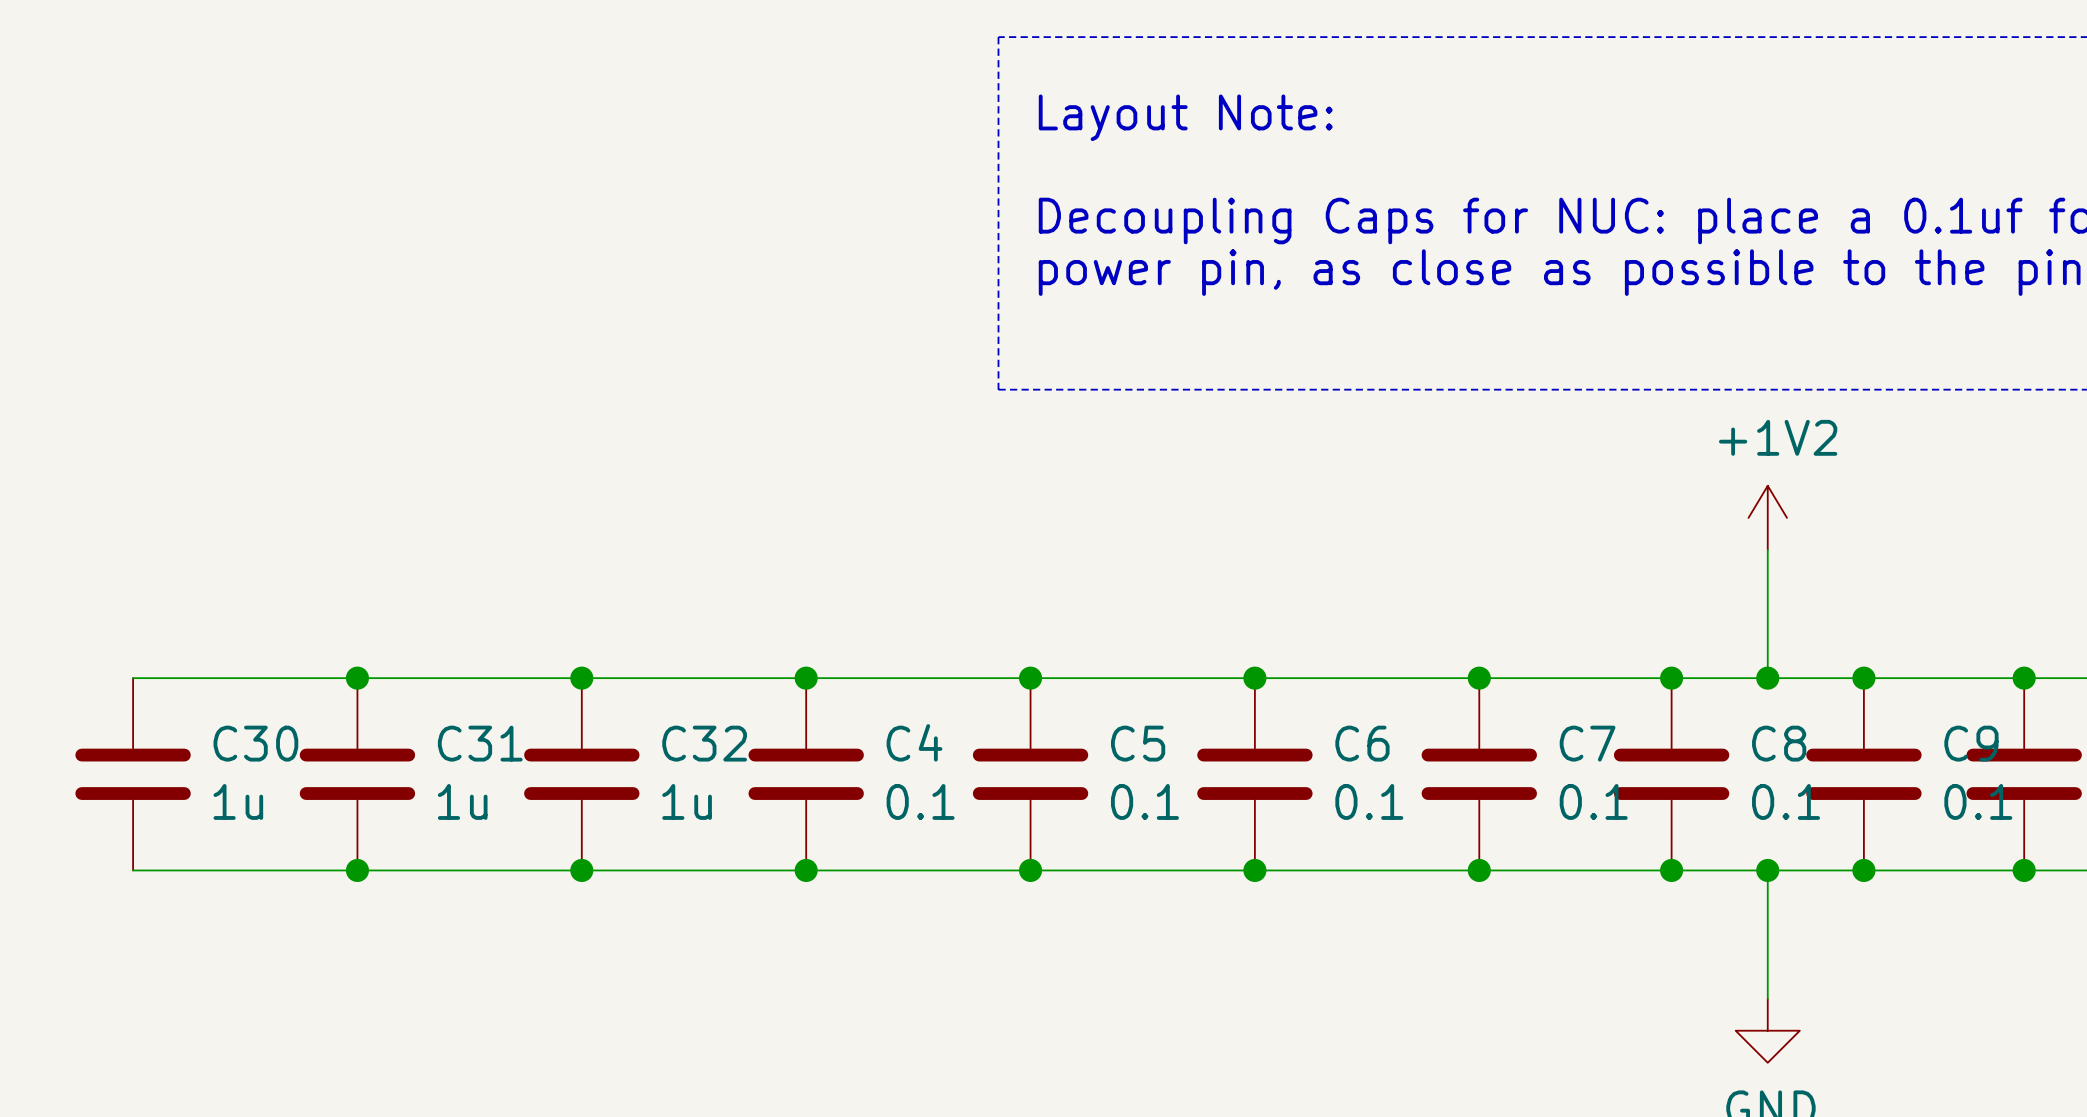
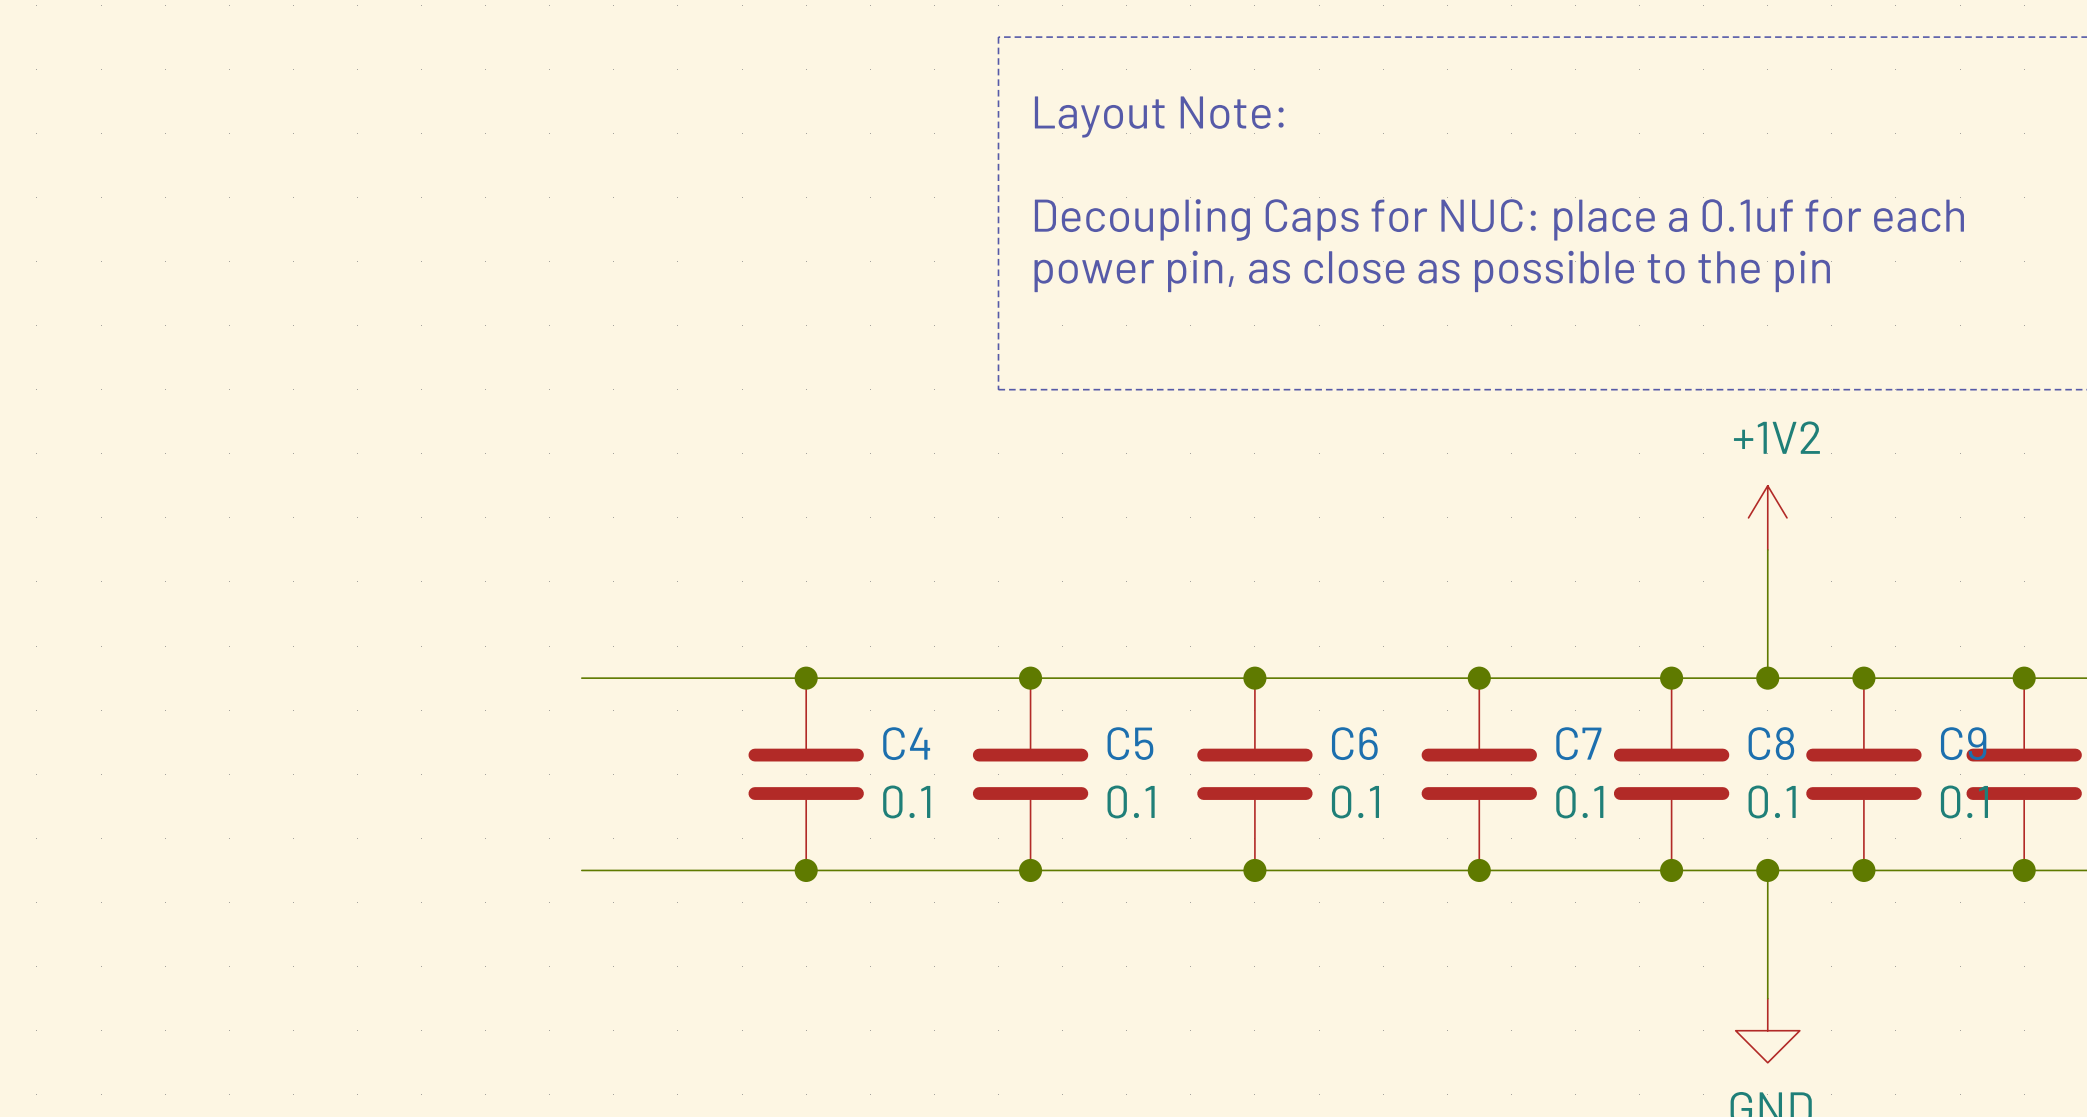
wire: (133, 678) (581, 678) -> none
junction: (357, 678) -> none
junction: (581, 678) -> none
C30: 1u (133, 774) -> none
C31: 1u (357, 774) -> none
C32: 1u (581, 774) -> none
wire: (133, 870) (581, 870) -> none
junction: (357, 870) -> none
junction: (581, 870) -> none

